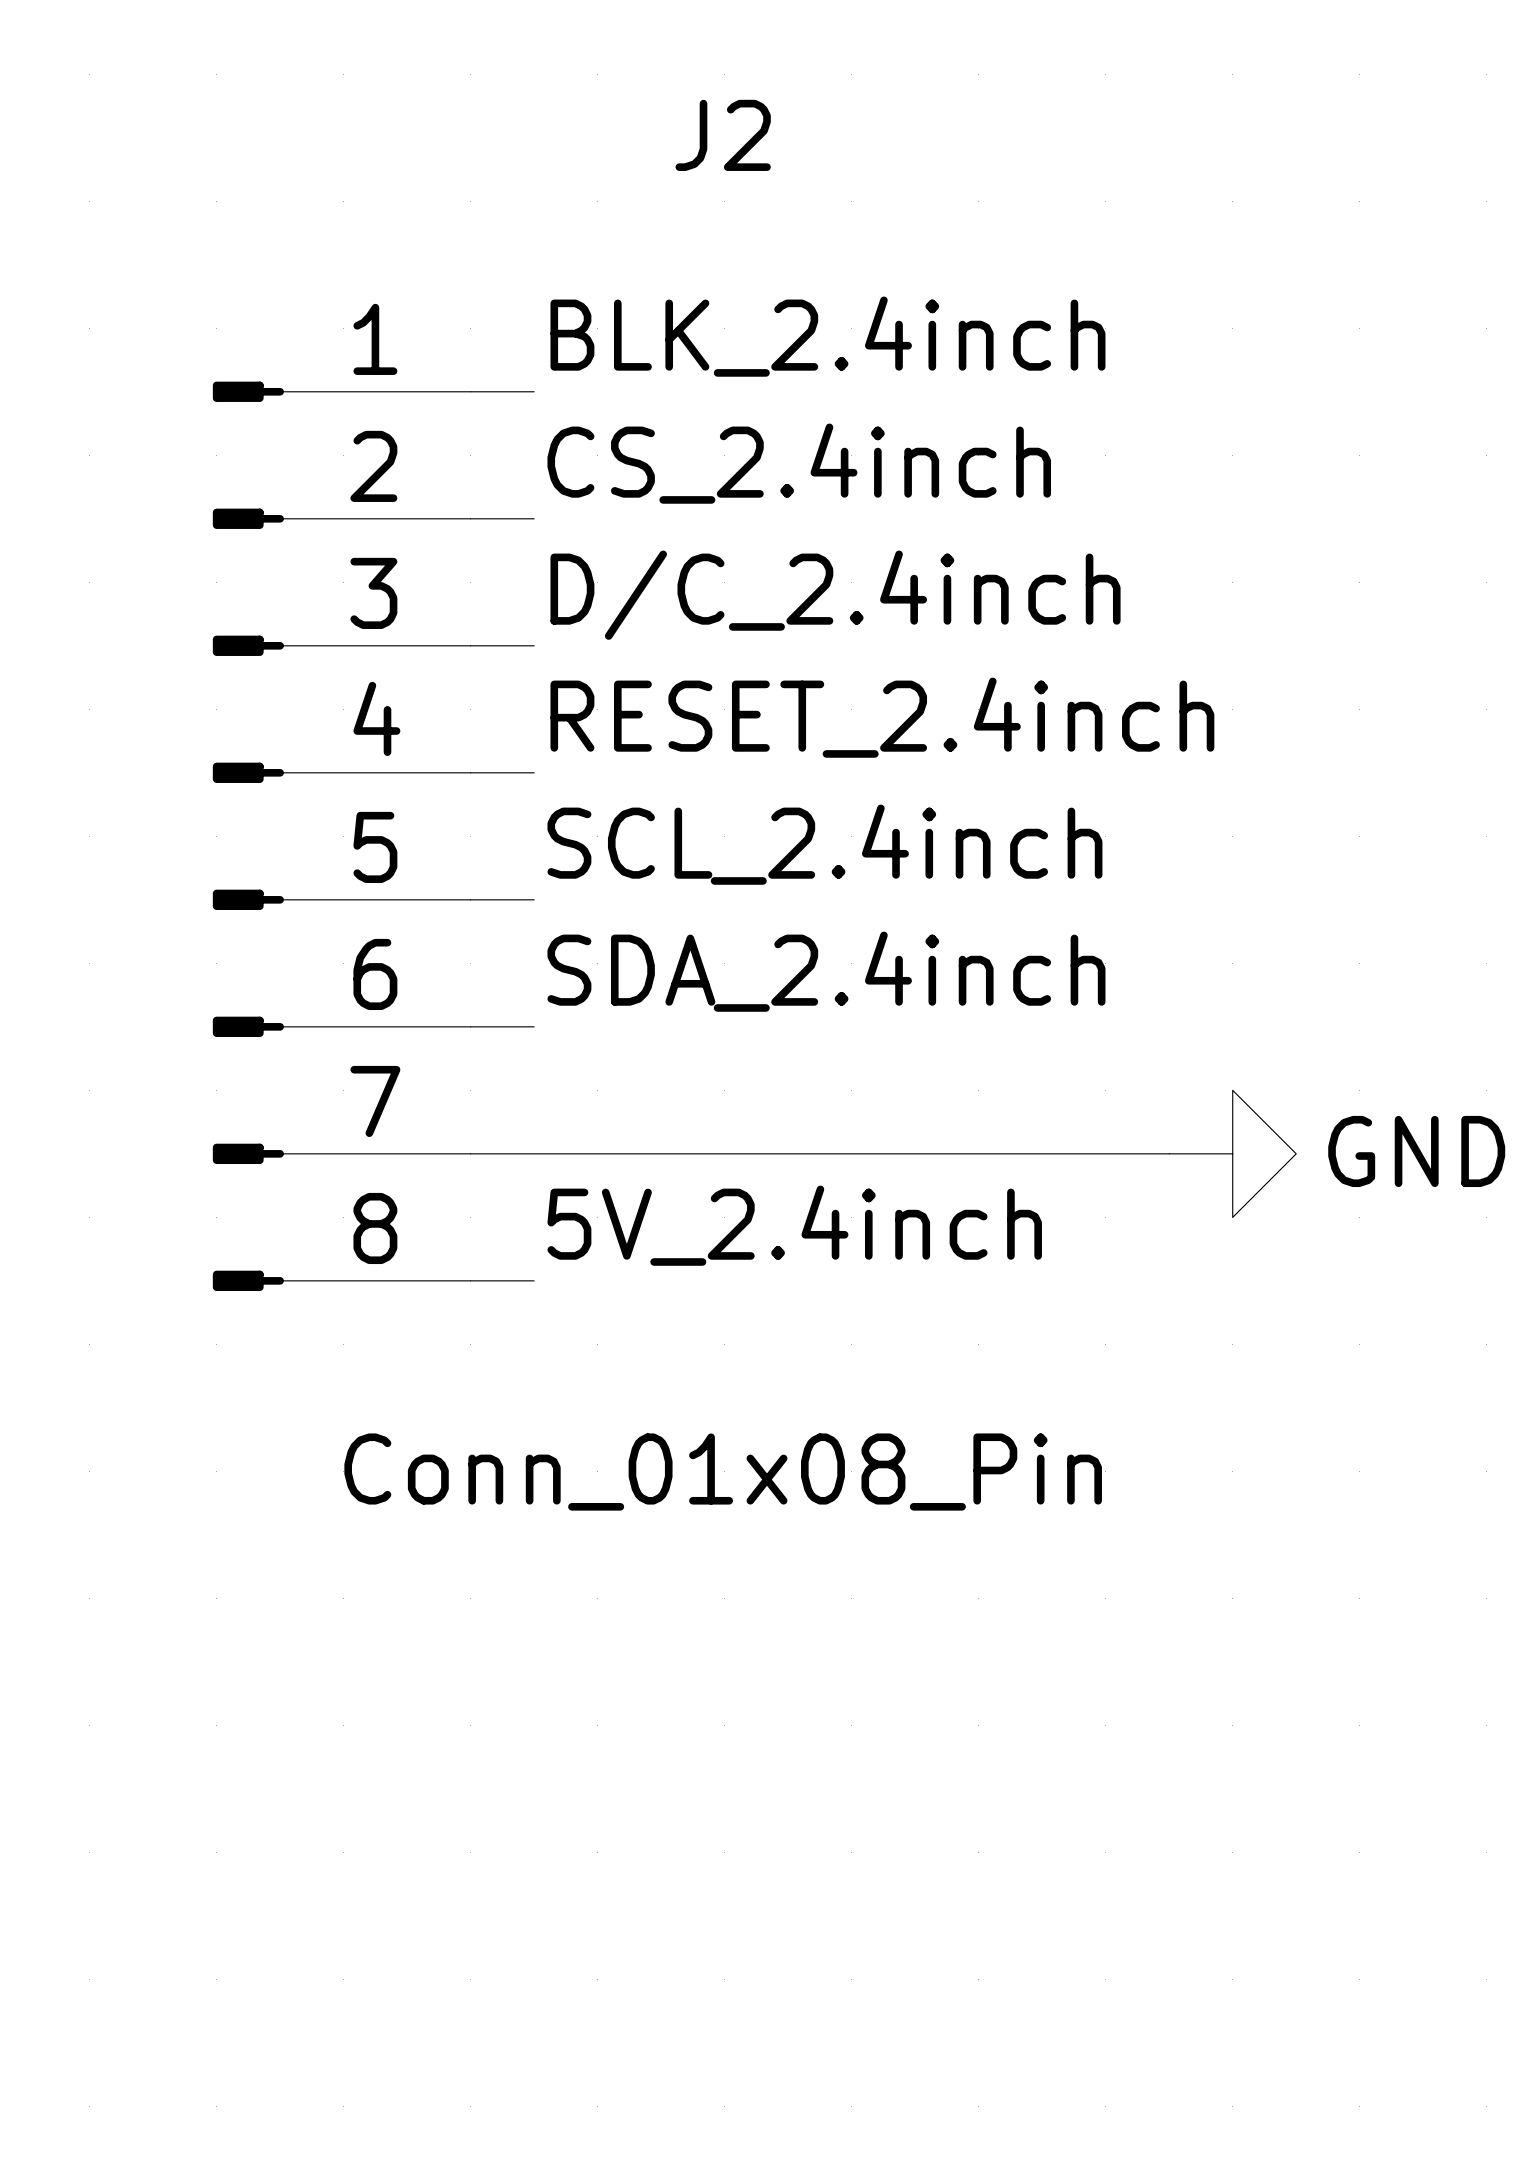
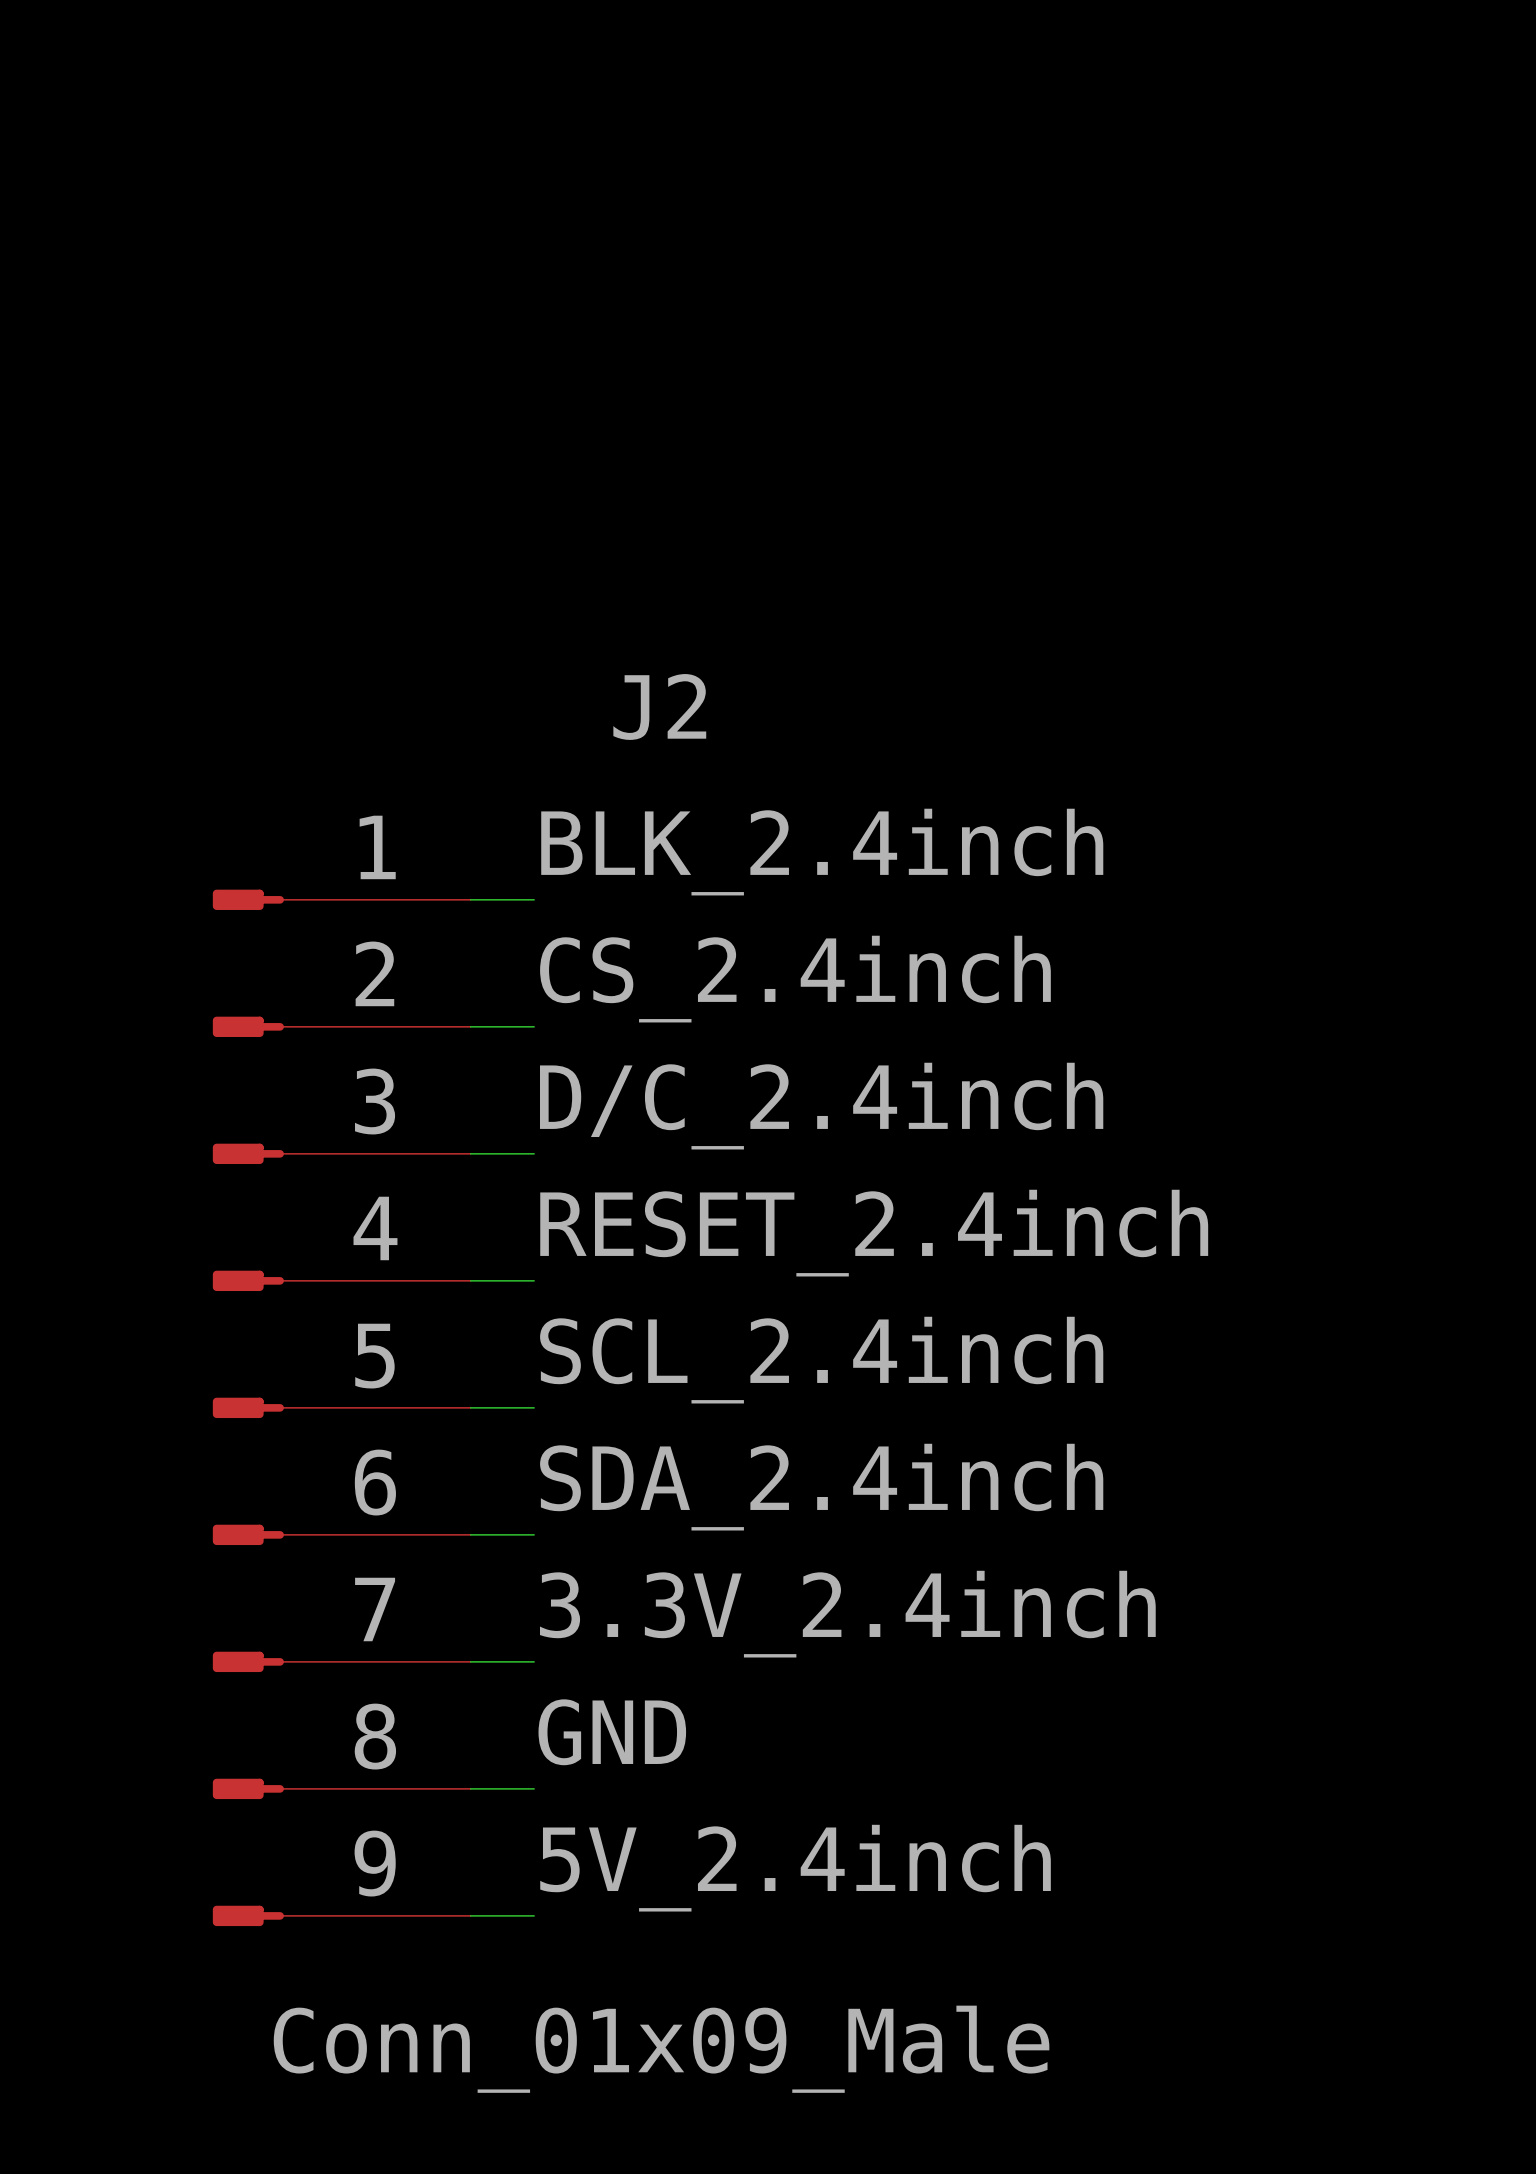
label: BLK_2.4inch (827, 336) -> none
J2 symbol: [212, 381, 471, 1292] -> [212, 889, 471, 1927]
wire: (470, 391) (534, 391) -> (470, 1407) (534, 1407)
label: CS_2.4inch (799, 463) -> none
wire: (470, 518) (534, 518) -> (470, 1534) (534, 1534)
label position: D/C_2.4inch (835, 595) -> D/C_2.4inch (821, 1106)
wire: (470, 645) (534, 645) -> (470, 1661) (534, 1661)
label: RESET_2.4inch (882, 717) -> none
wire: (470, 772) (534, 772) -> (470, 1788) (534, 1788)
label: SCL_2.4inch (824, 844) -> BLK_2.4inch (822, 852)
label: SDA_2.4inch (826, 971) -> CS_2.4inch (795, 979)
wire: (534, 1153) (1169, 1153) -> none
power symbol: GND (1232, 1153) -> none
label: 5V_2.4inch (794, 1225) -> RESET_2.4inch (874, 1233)
label: none -> SCL_2.4inch (821, 1360)
J2 value: Conn_01x08_Pin (723, 1472) -> Conn_01x09_Male (661, 2049)
label: none -> SDA_2.4inch (821, 1487)
label: none -> 3.3V_2.4inch (847, 1614)
label: none -> GND (612, 1732)
label: none -> 5V_2.4inch (795, 1868)
wire: none -> (470, 1915) (534, 1915)

